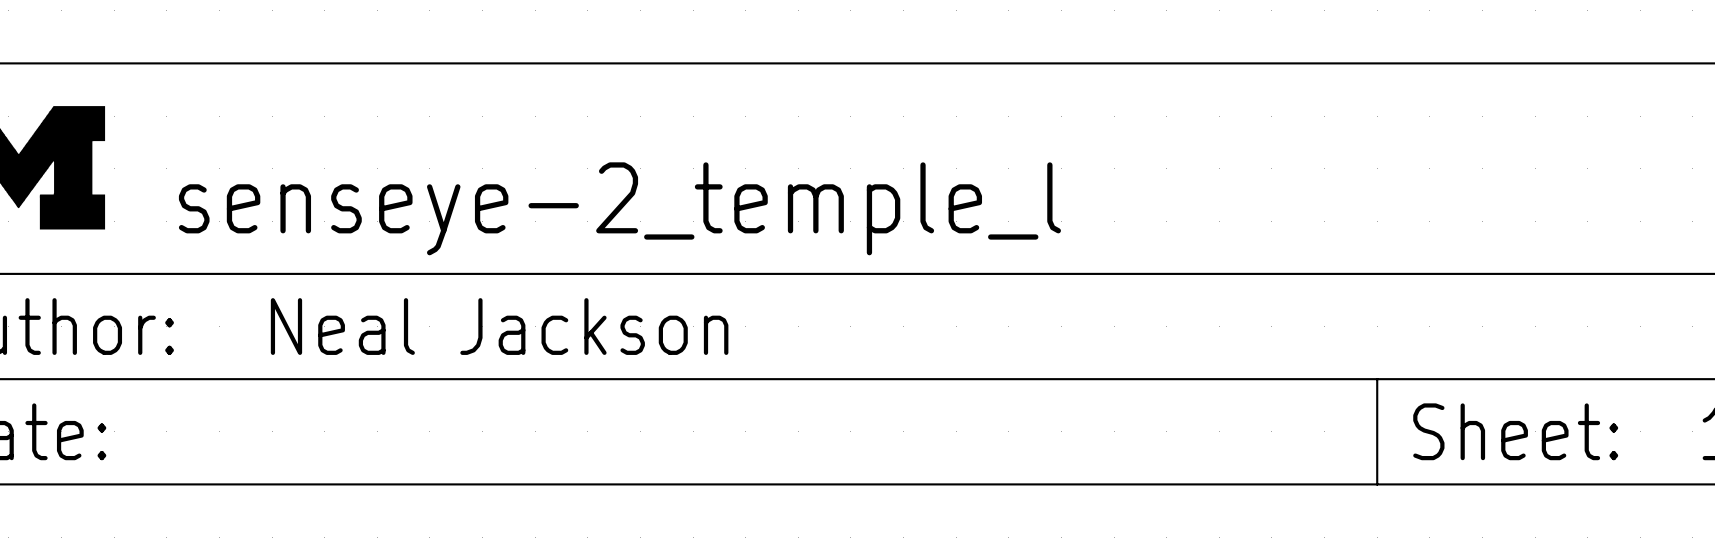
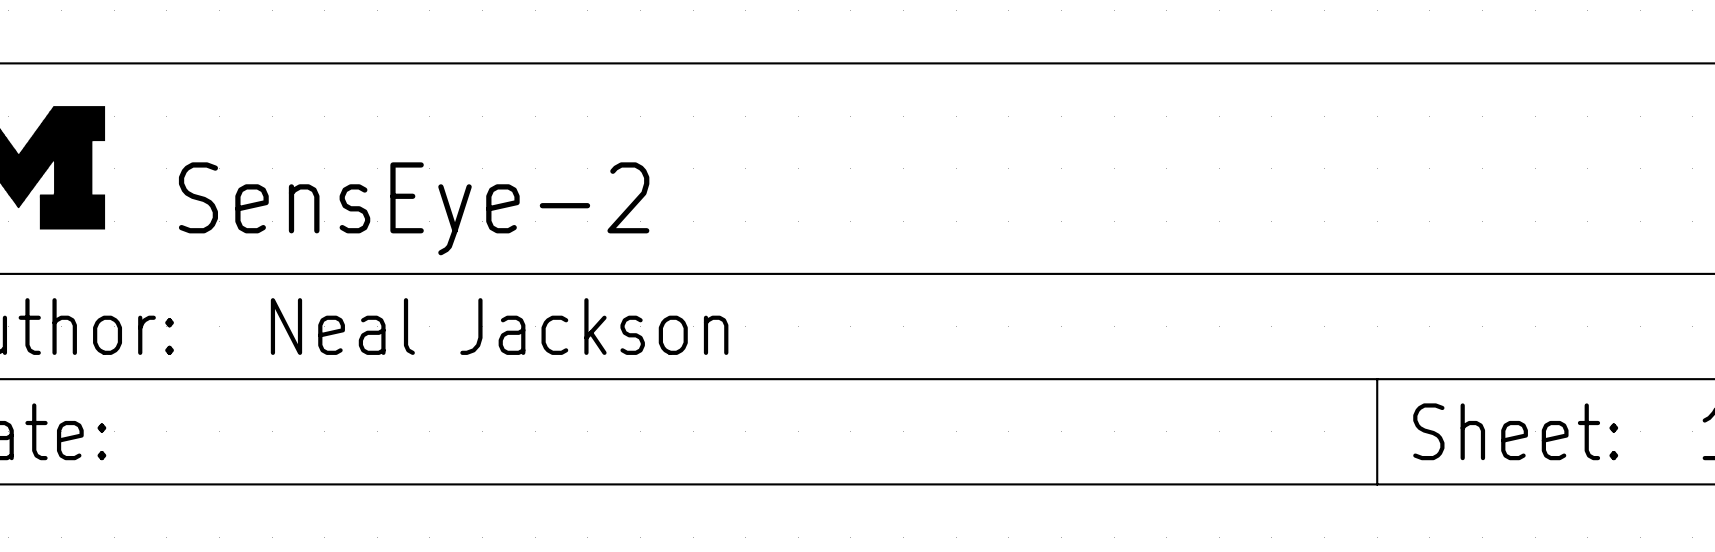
part text: senseye-2_temple_l (619, 208) -> SensEye-2 (414, 208)

